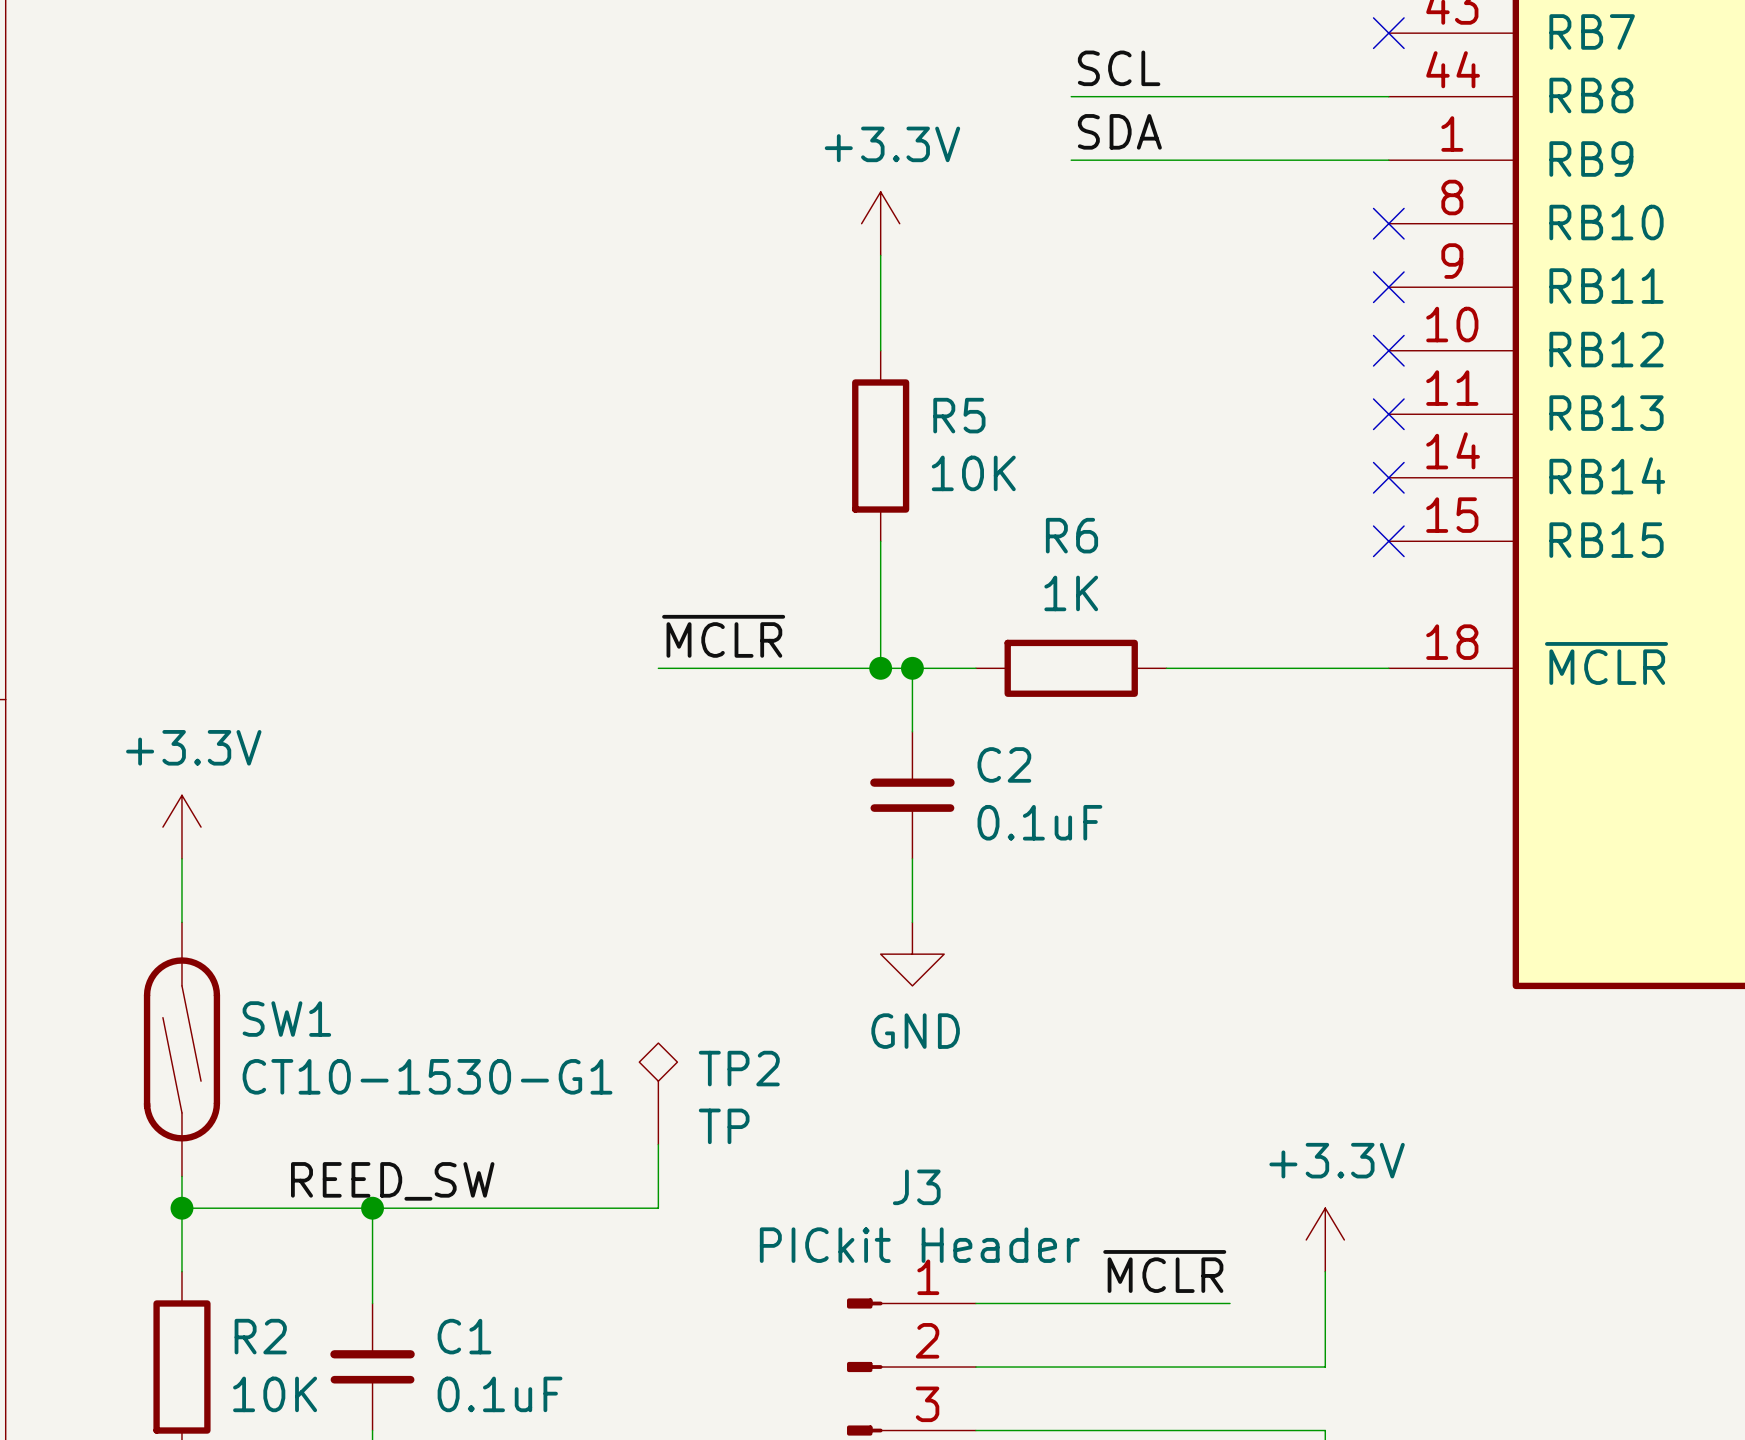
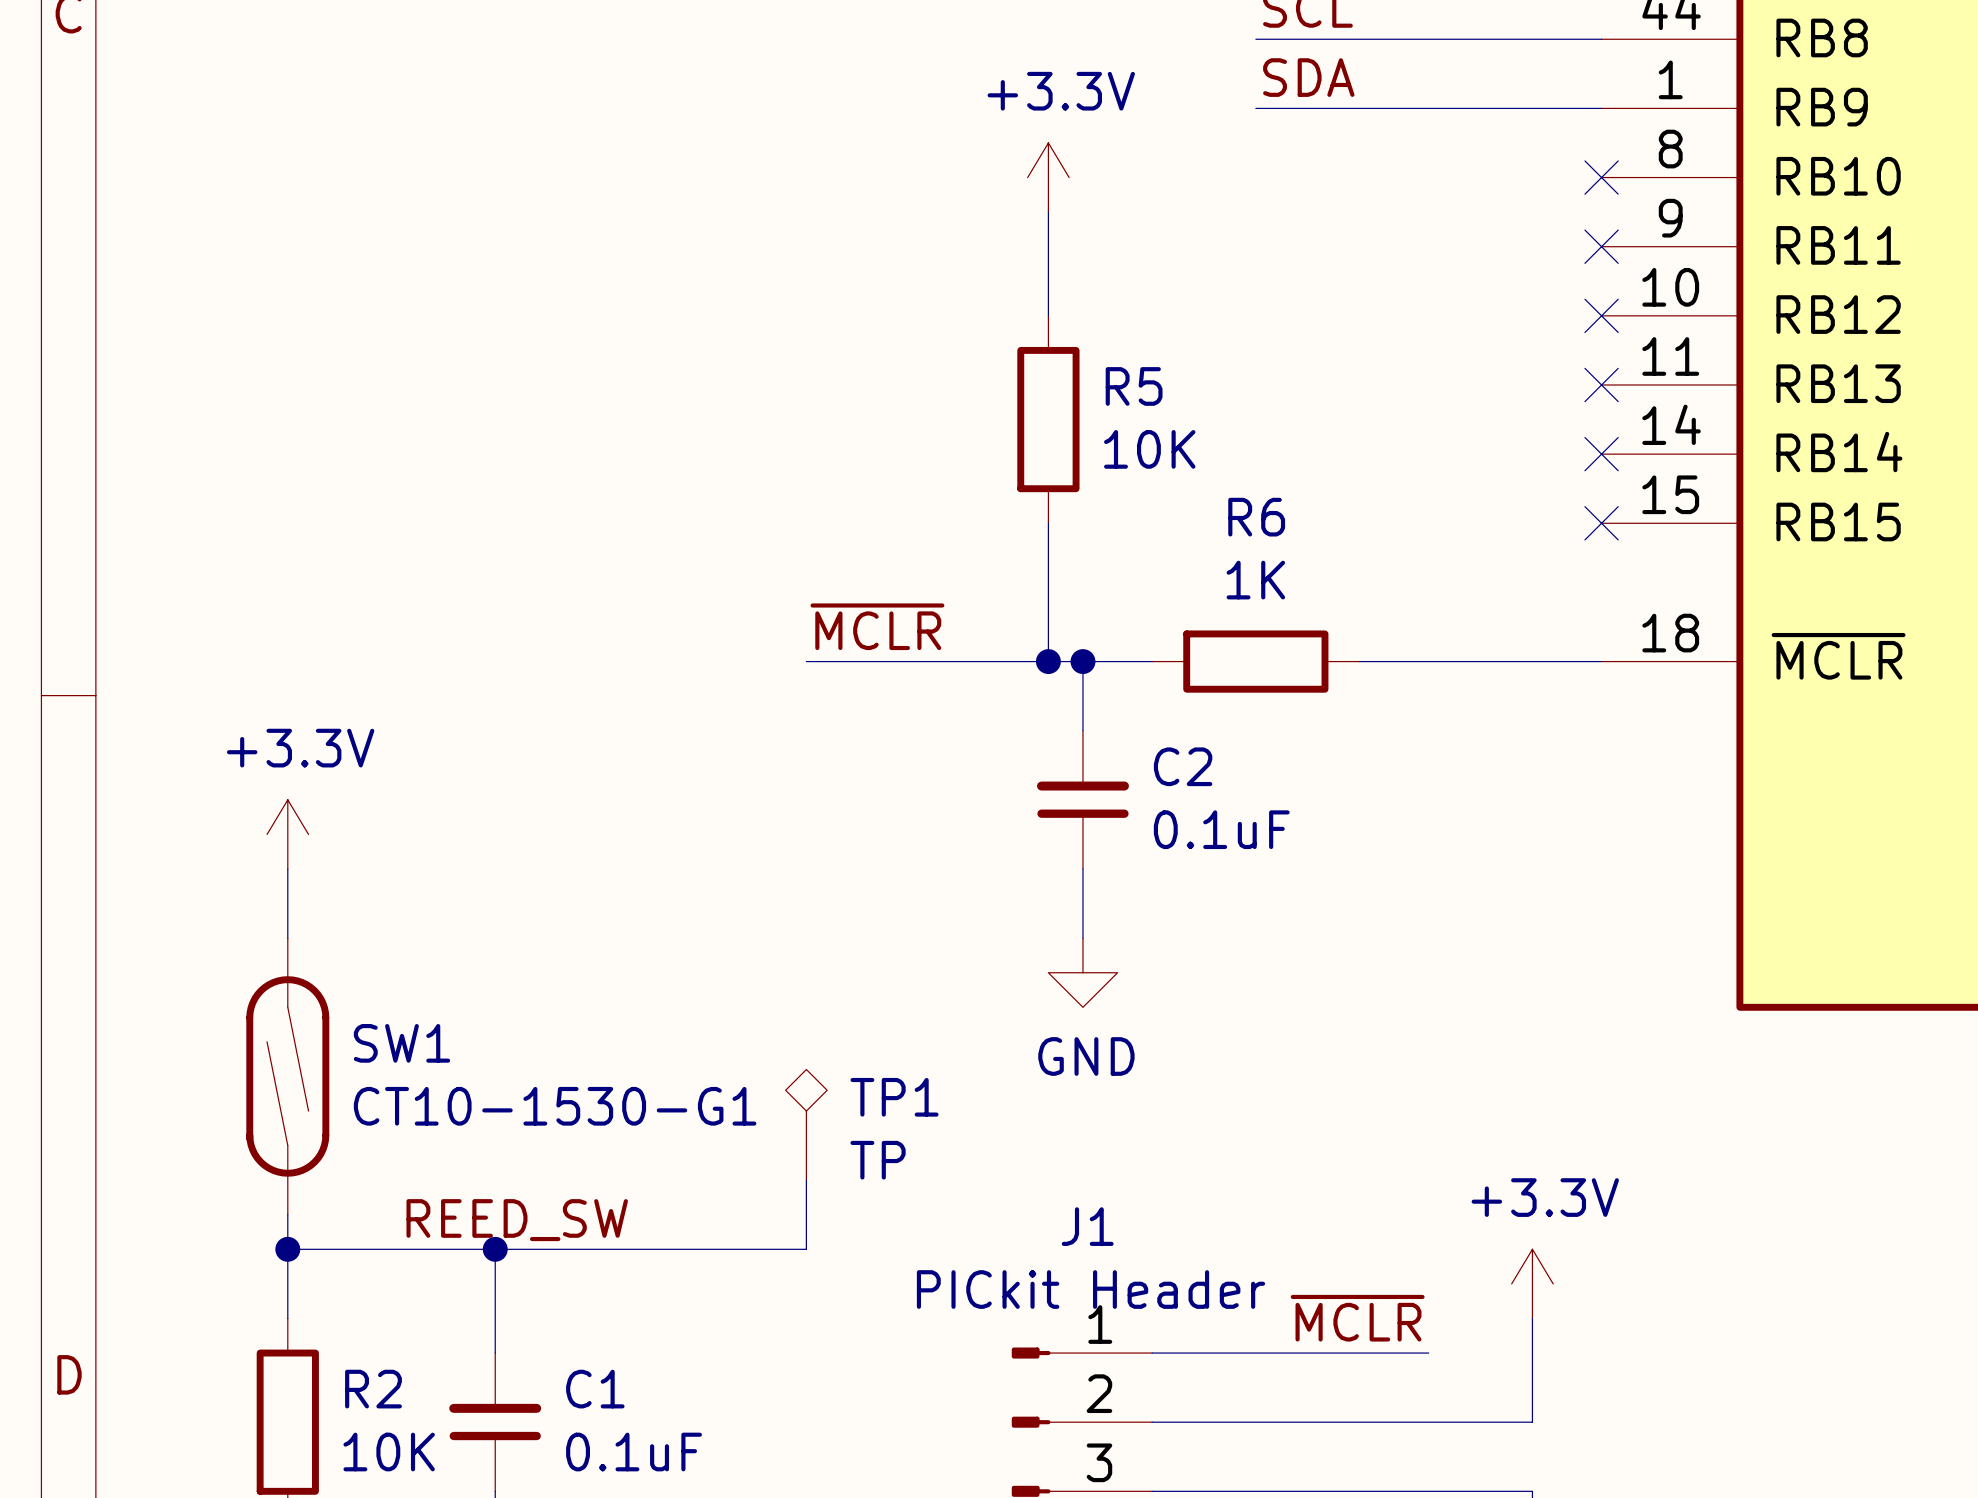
TP2 name: TP2 (739, 1068) -> TP1 (894, 1097)
J3 name: J3 (916, 1187) -> J1 (1087, 1226)

